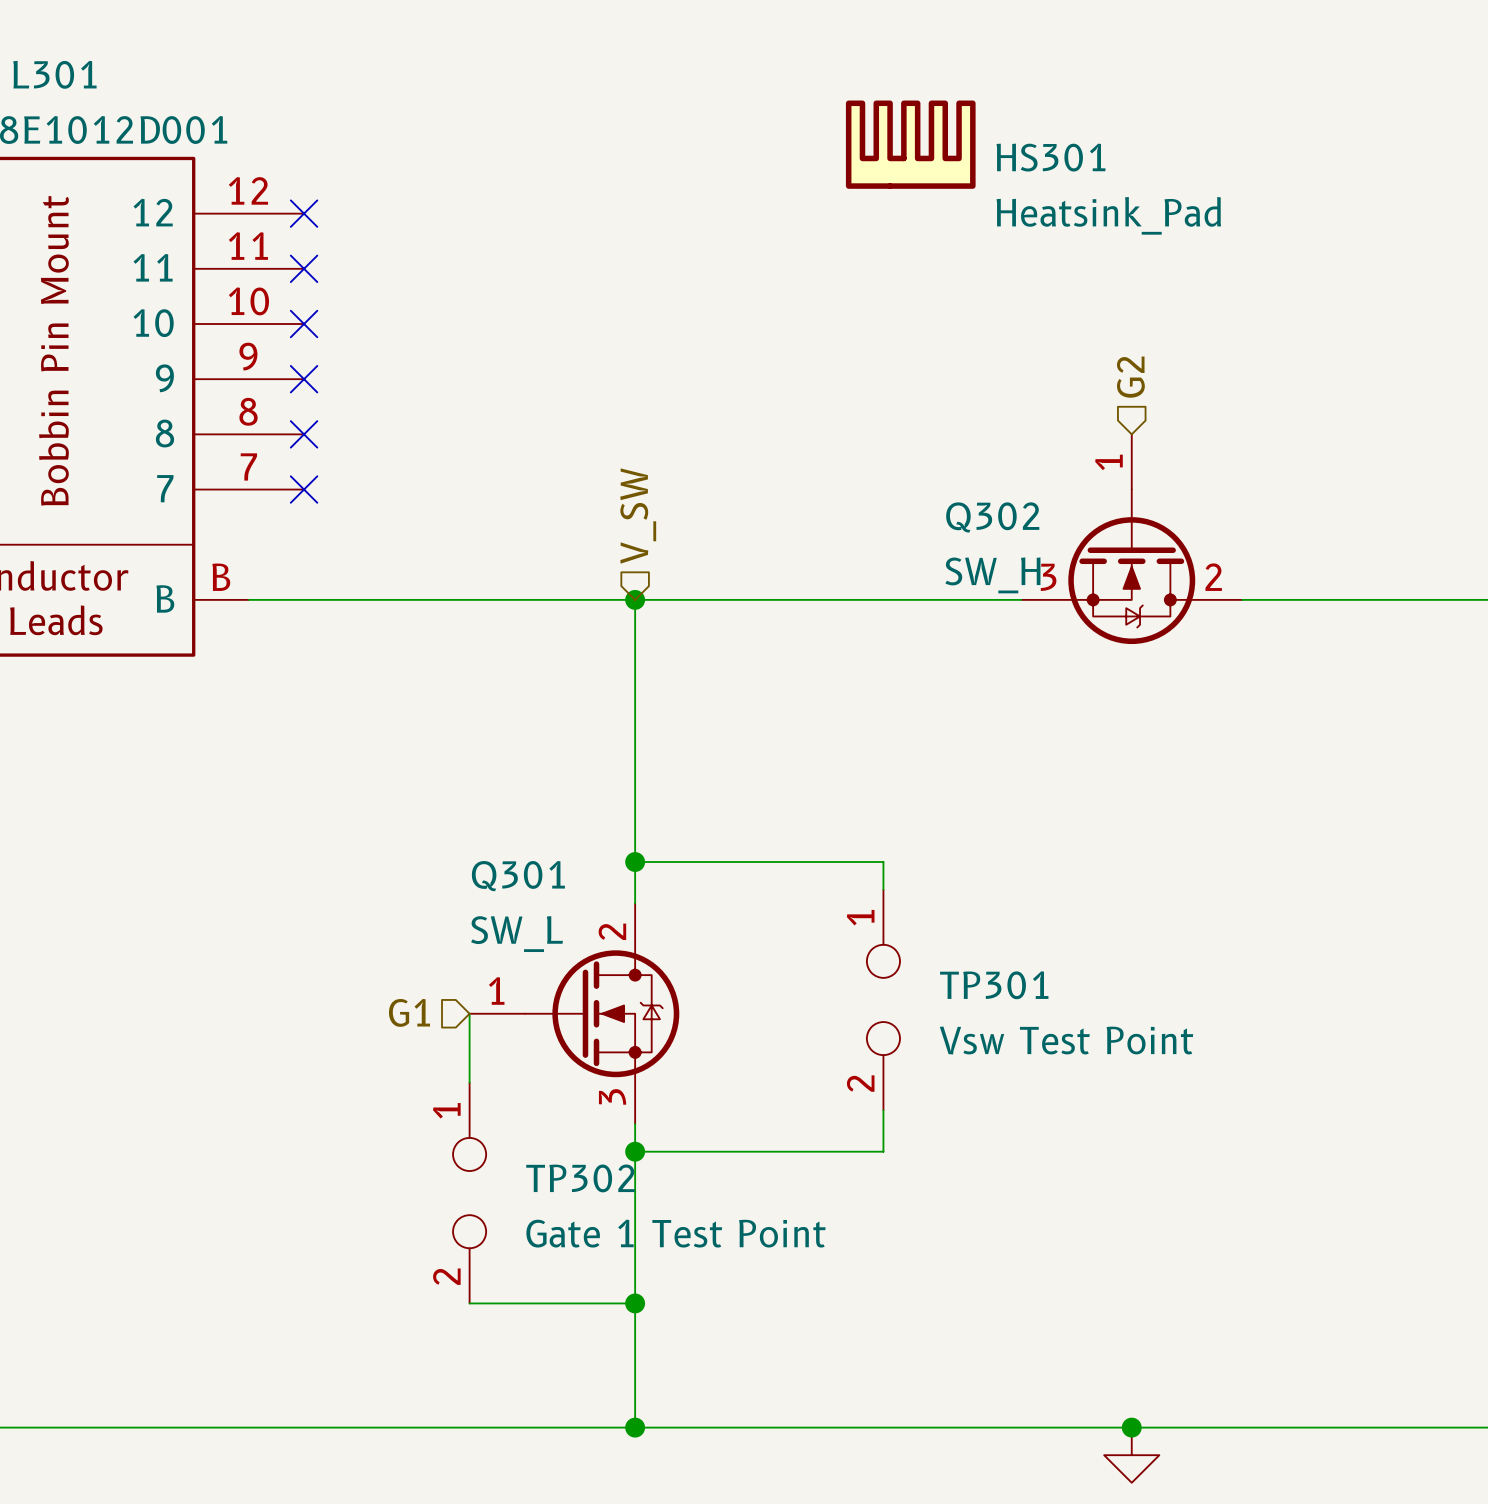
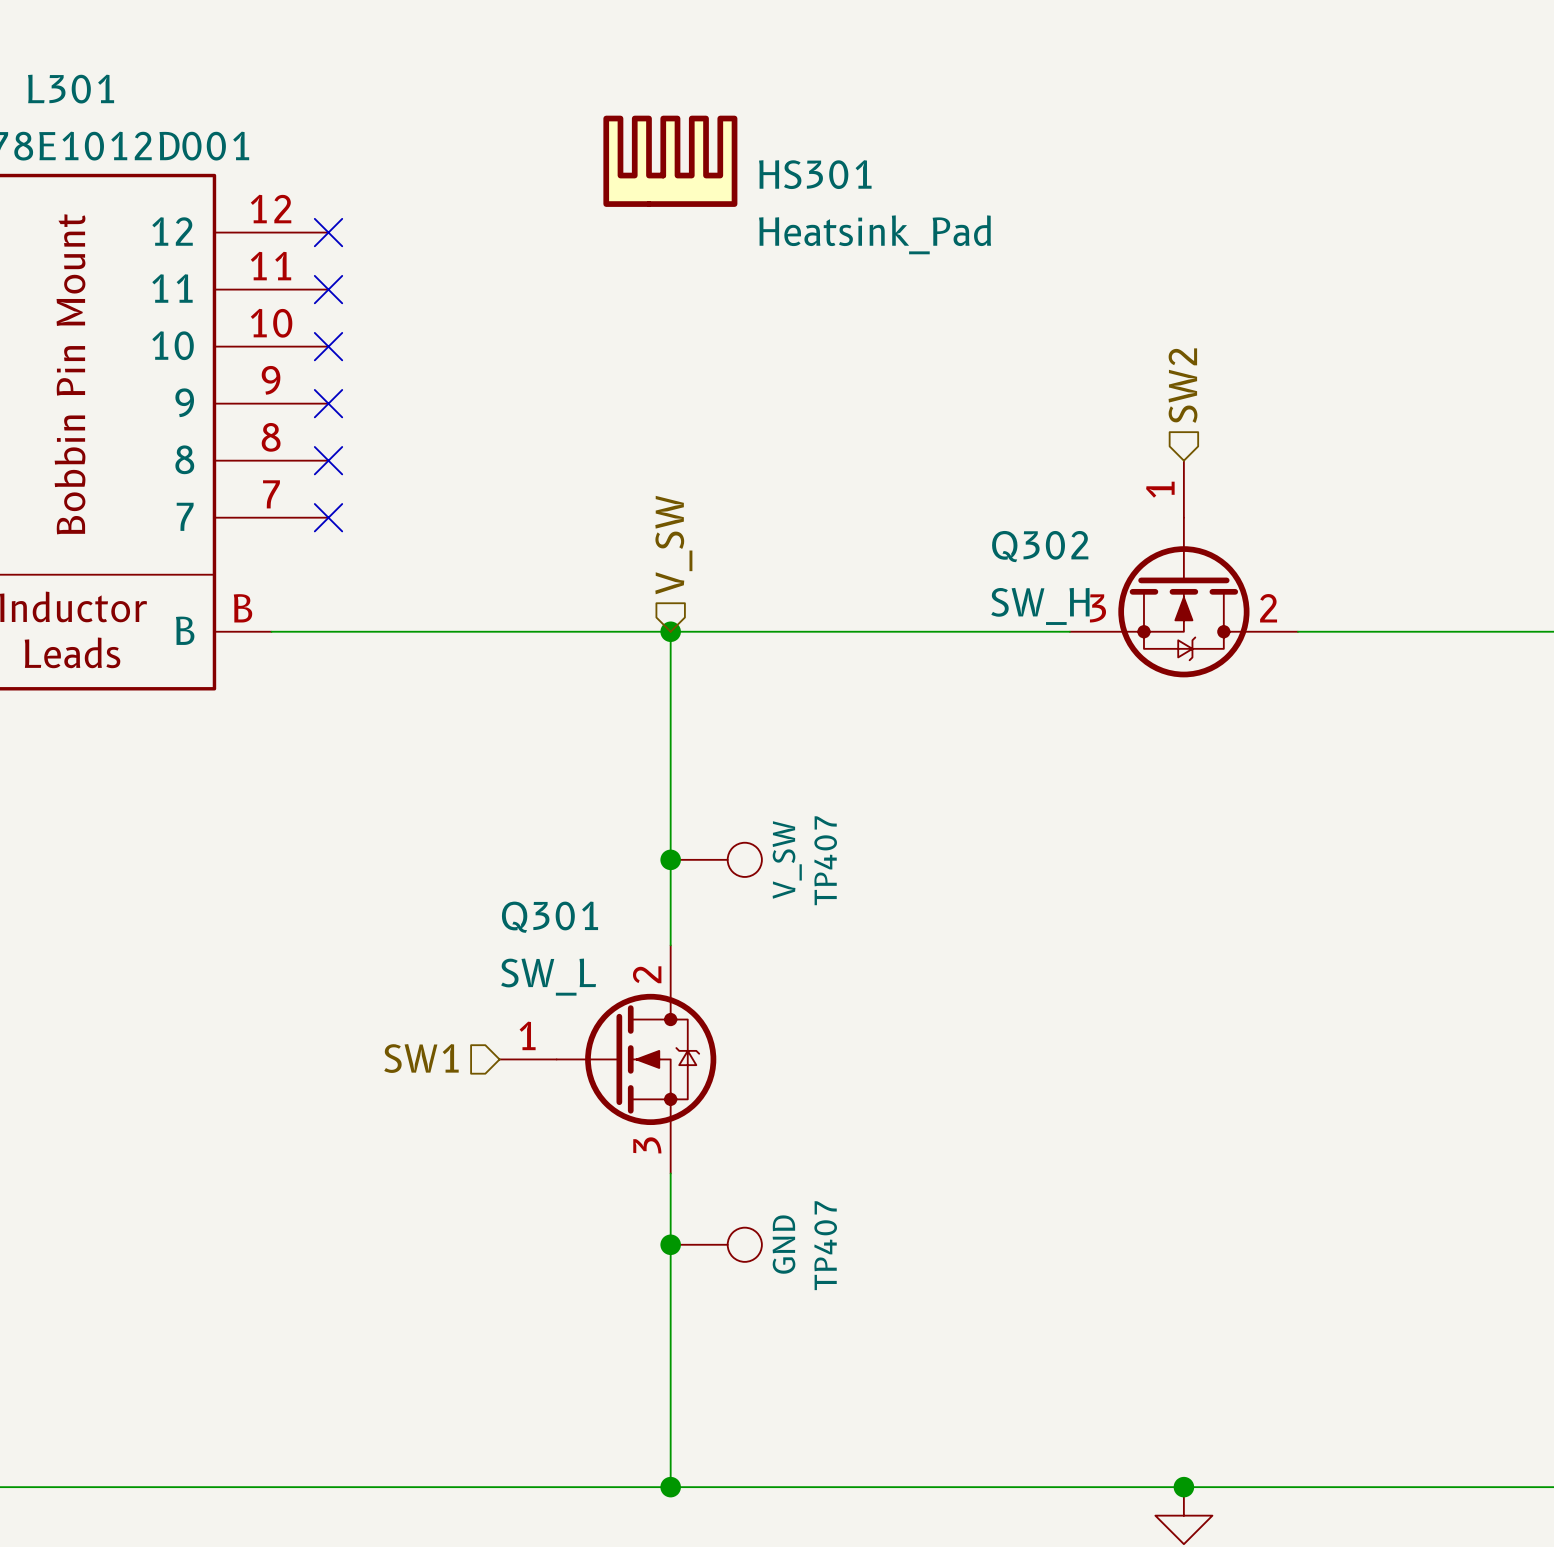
HS301 position: (910, 144) -> (670, 161)
hierarchical label: G2 (1130, 377) -> SW2 (1182, 385)
TP407: none -> V_SW (716, 859)
wire: (635, 862) (883, 862) (883, 889) -> none
junction position: (635, 862) -> (670, 859)
TP301: Vsw Test Point (883, 999) -> none
hierarchical label: G1 (409, 1012) -> SW1 (421, 1058)
wire: (469, 1013) (469, 1082) -> none
wire: (883, 1110) (883, 1151) (635, 1151) -> none
junction position: (635, 1151) -> (670, 1244)
TP302: Gate 1 Test Point (469, 1193) -> none
TP407: none -> GND (716, 1244)
wire: (469, 1303) (635, 1303) -> none
junction: (635, 1303) -> none

